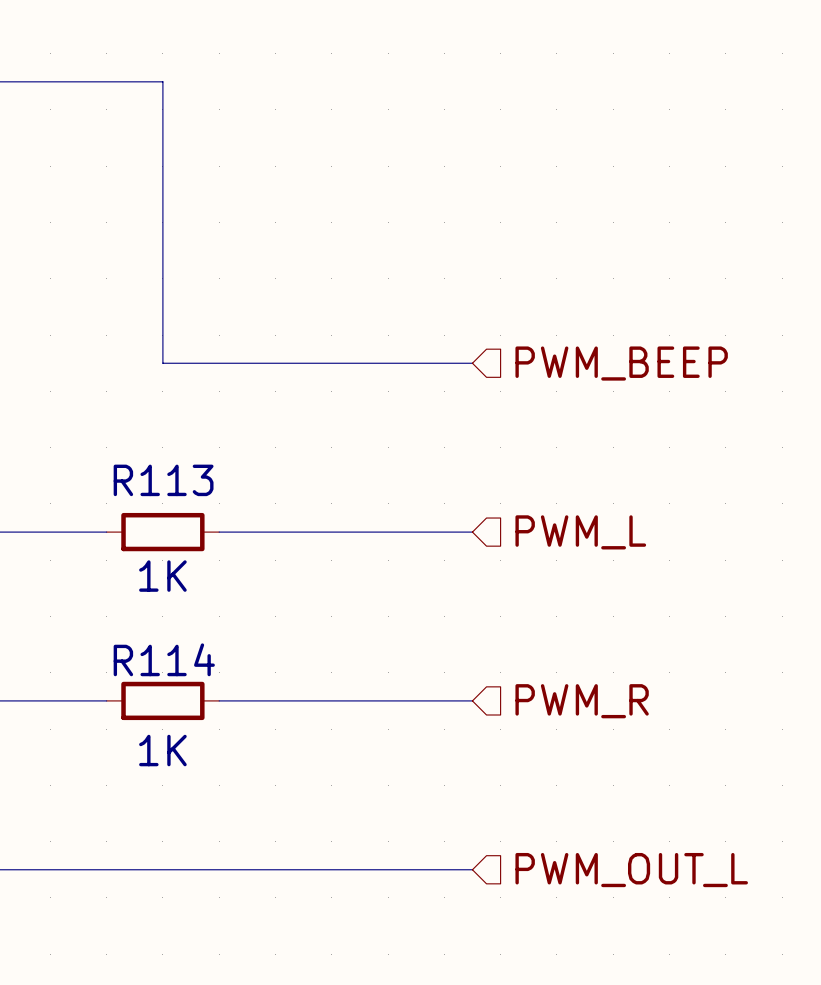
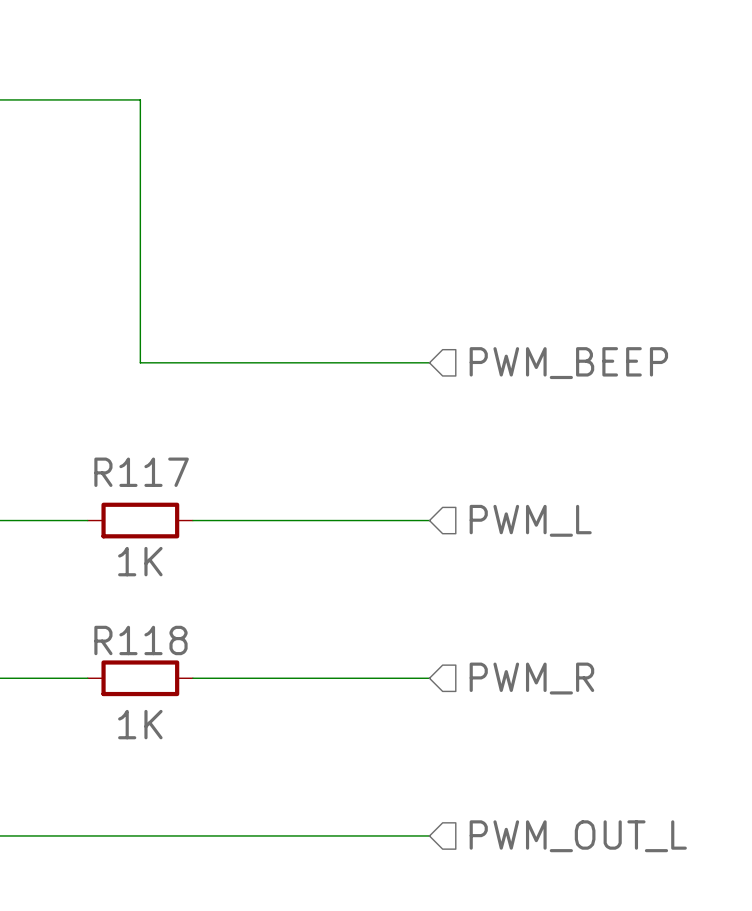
R113 name: R113 (163, 480) -> R117 (141, 472)
R114 name: R114 (164, 659) -> R118 (140, 640)

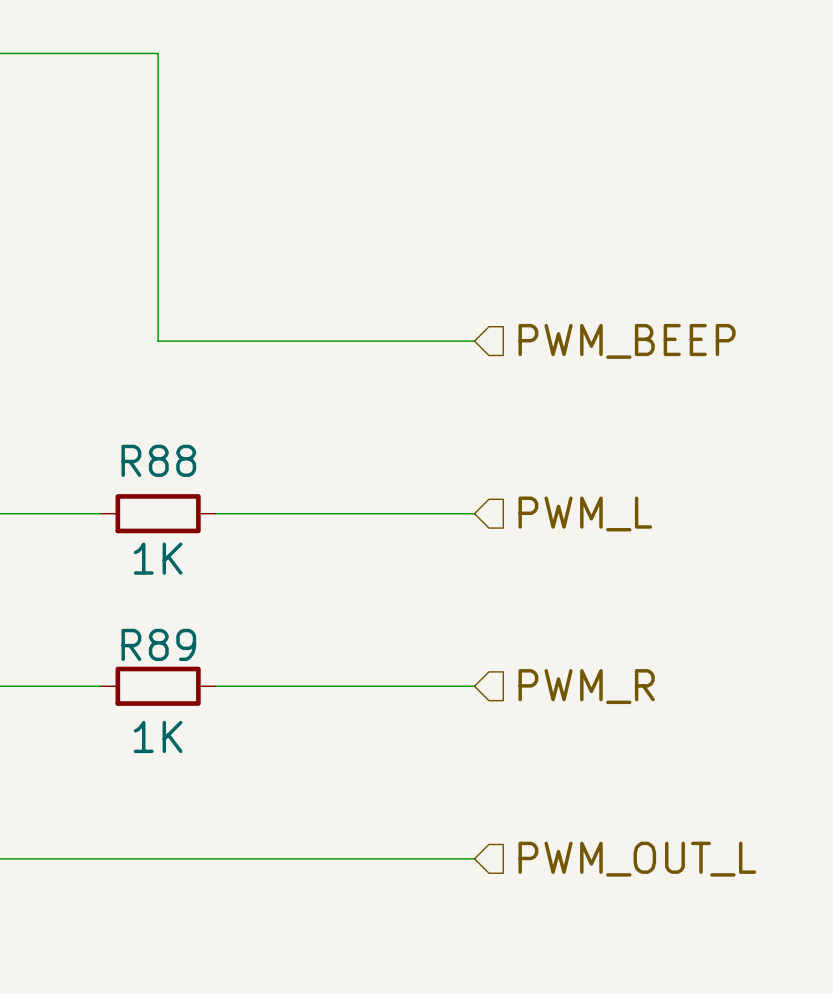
R117 name: R117 (141, 472) -> R88 (158, 460)
R118 name: R118 (140, 640) -> R89 (158, 644)

